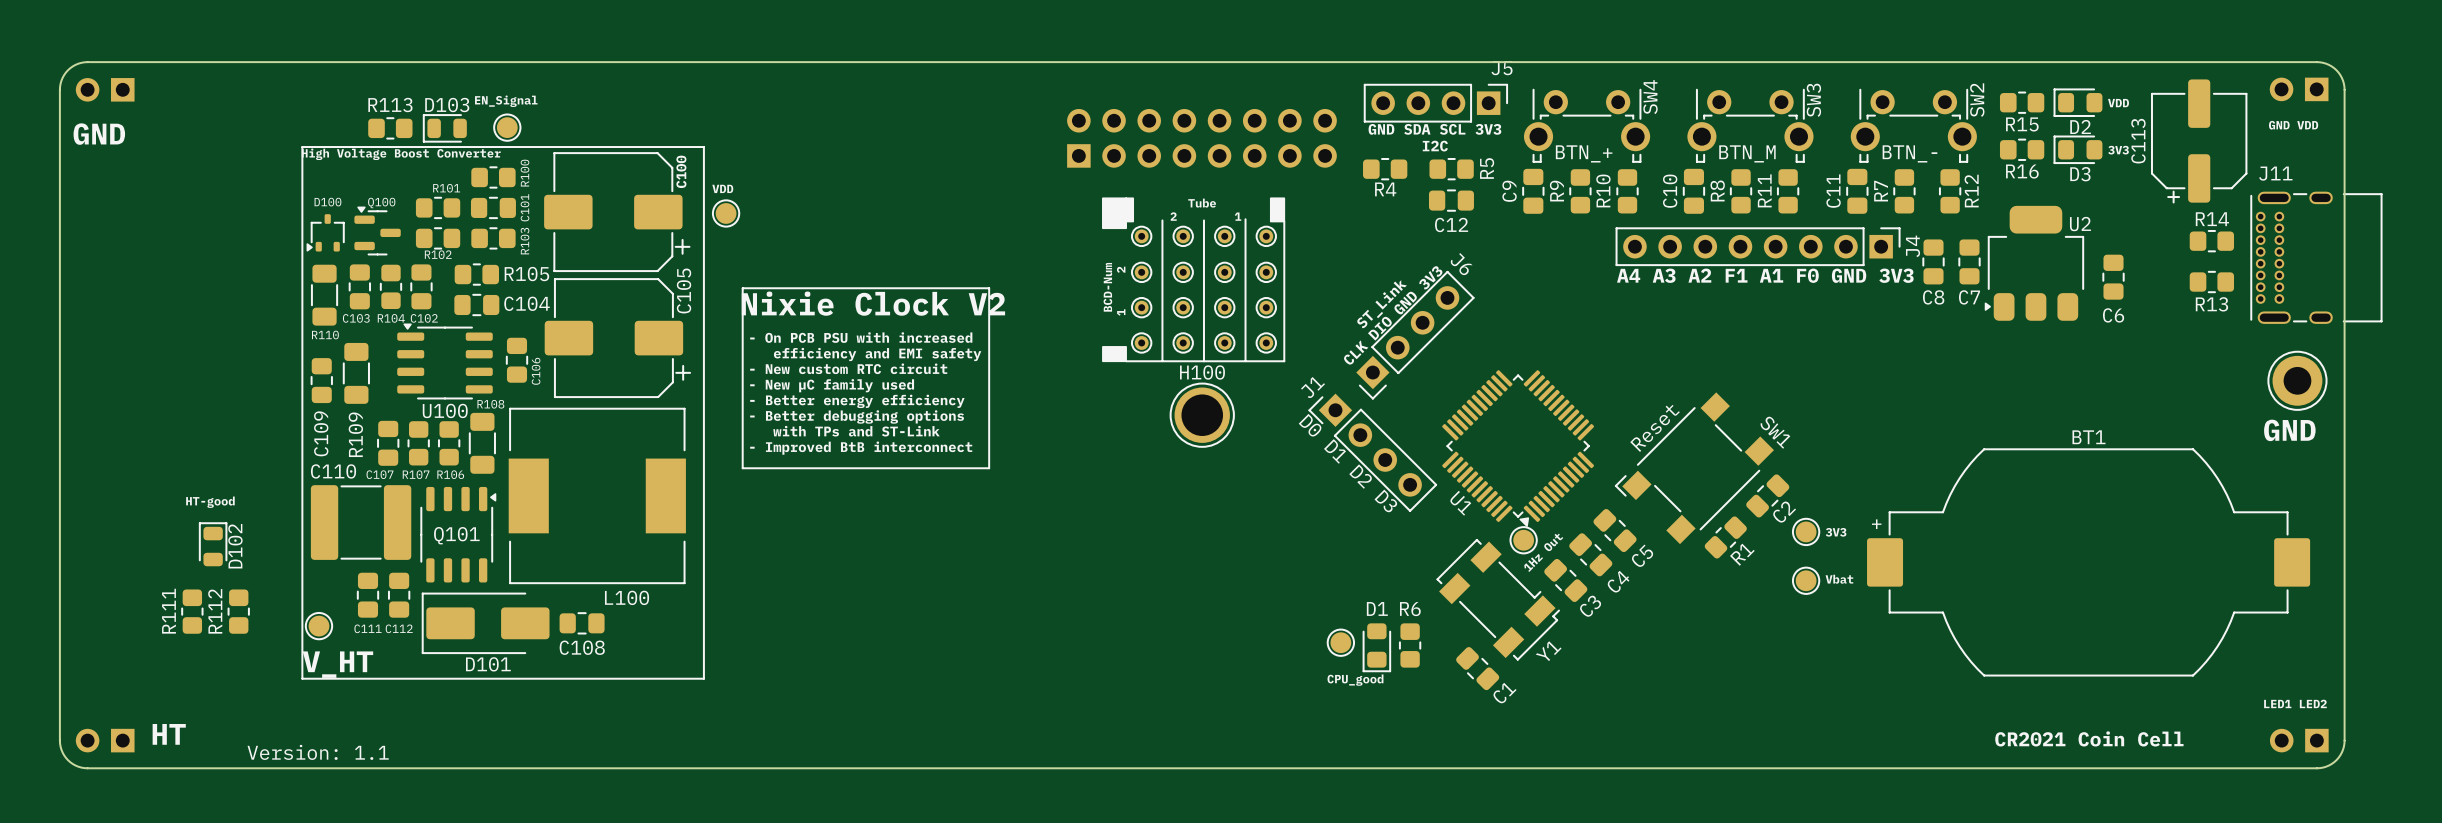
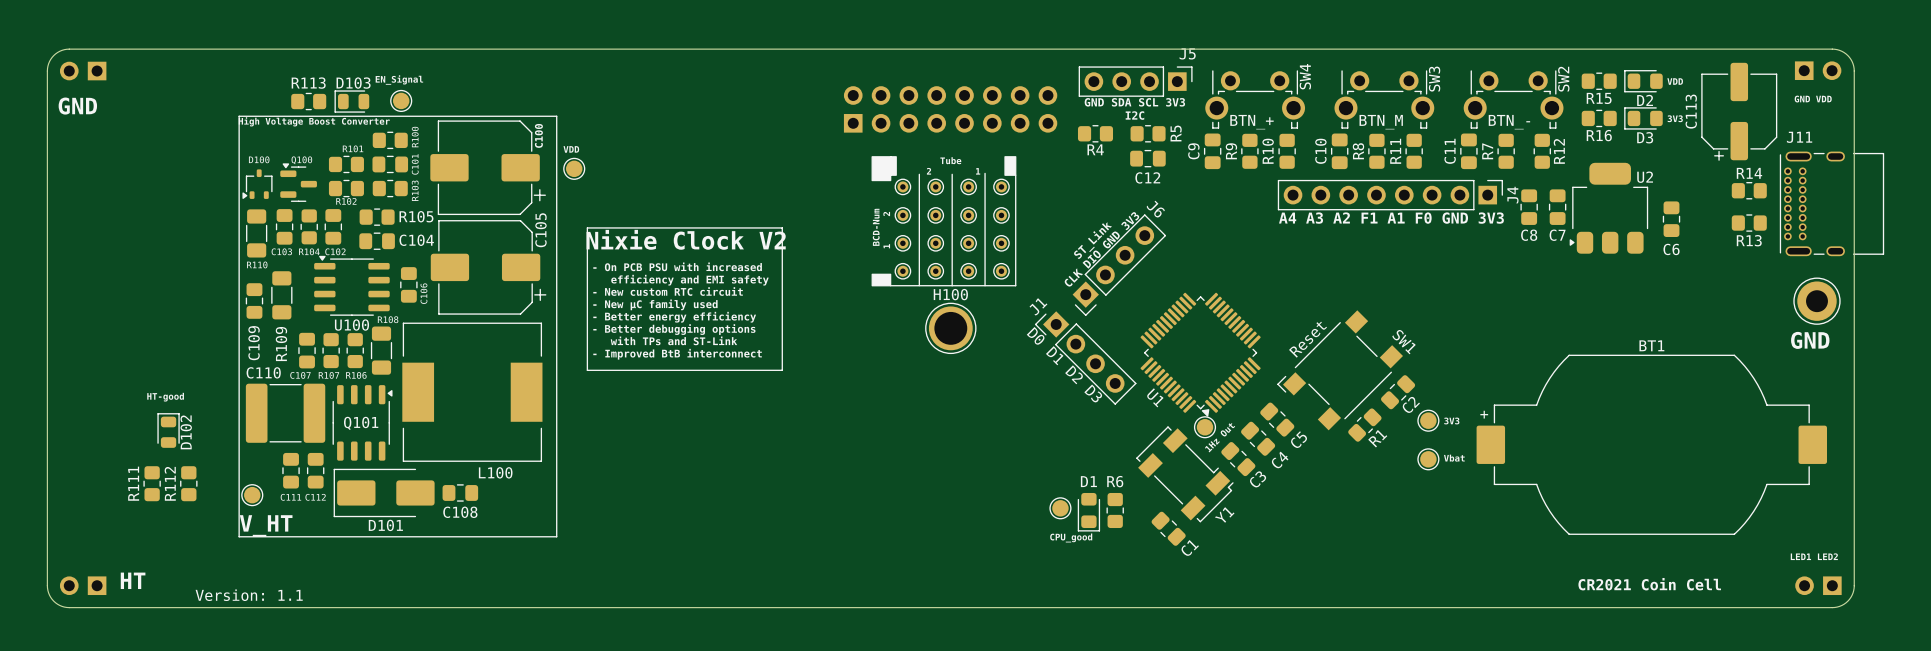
part rotation: 0° (2299, 89) -> 180° (1818, 70)

